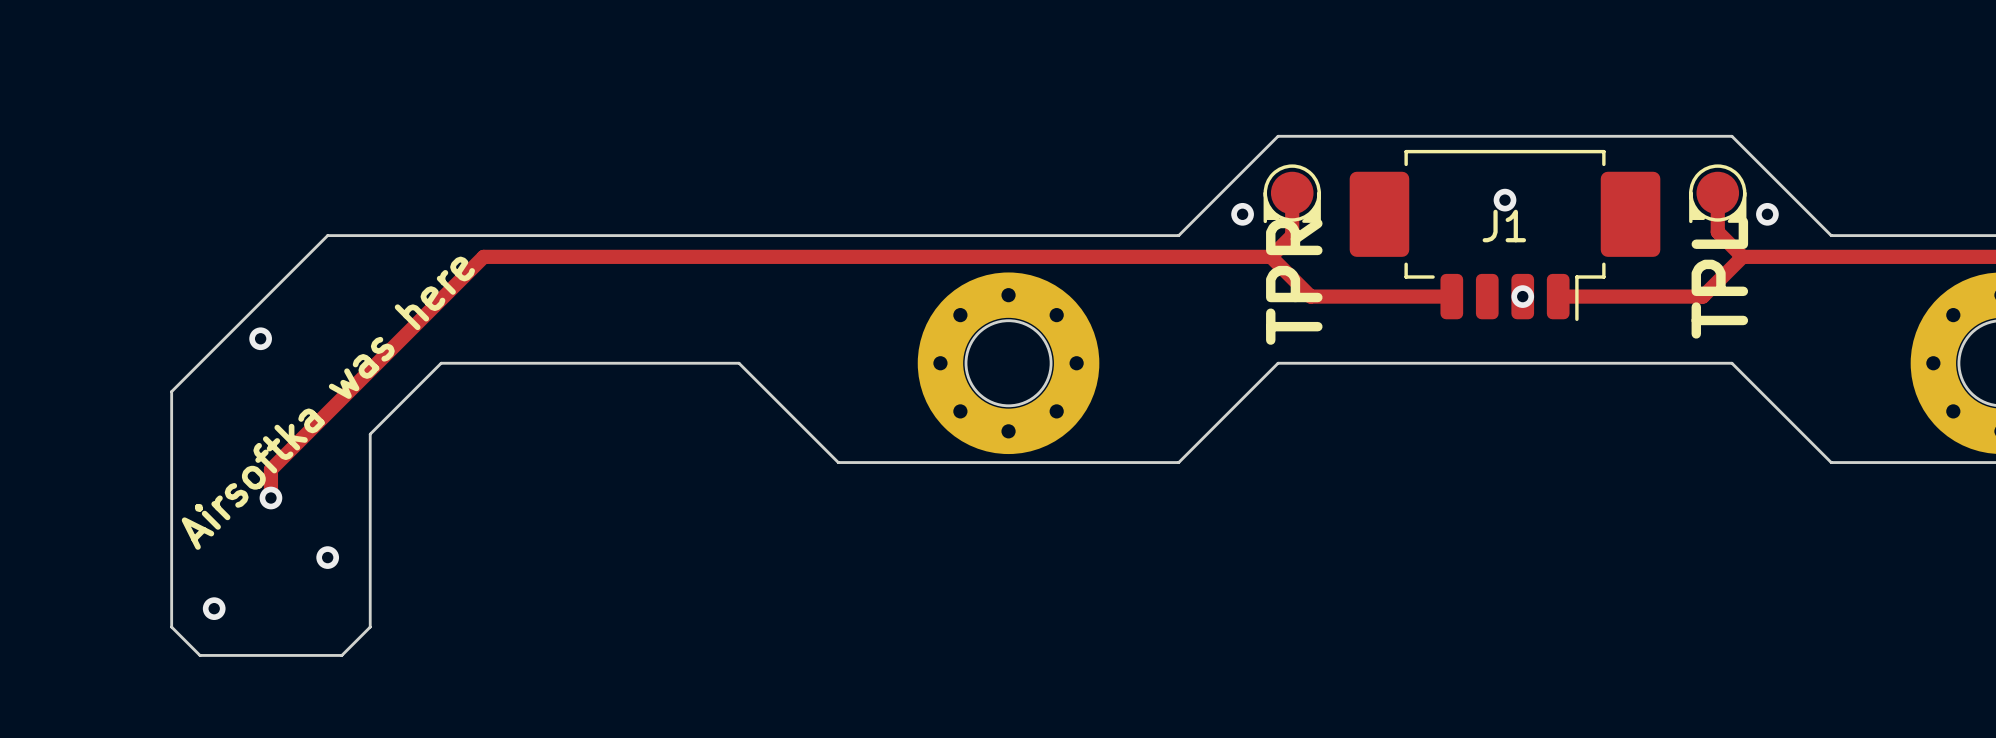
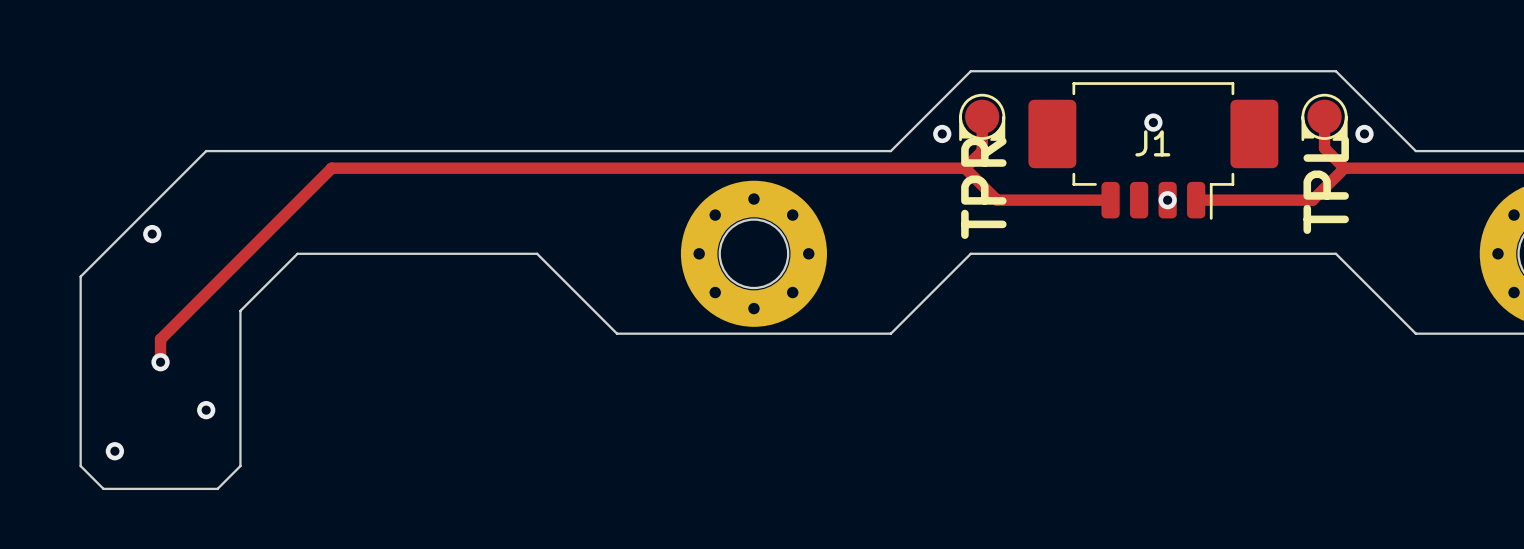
text: Airsoftka was here (328, 403) -> none

